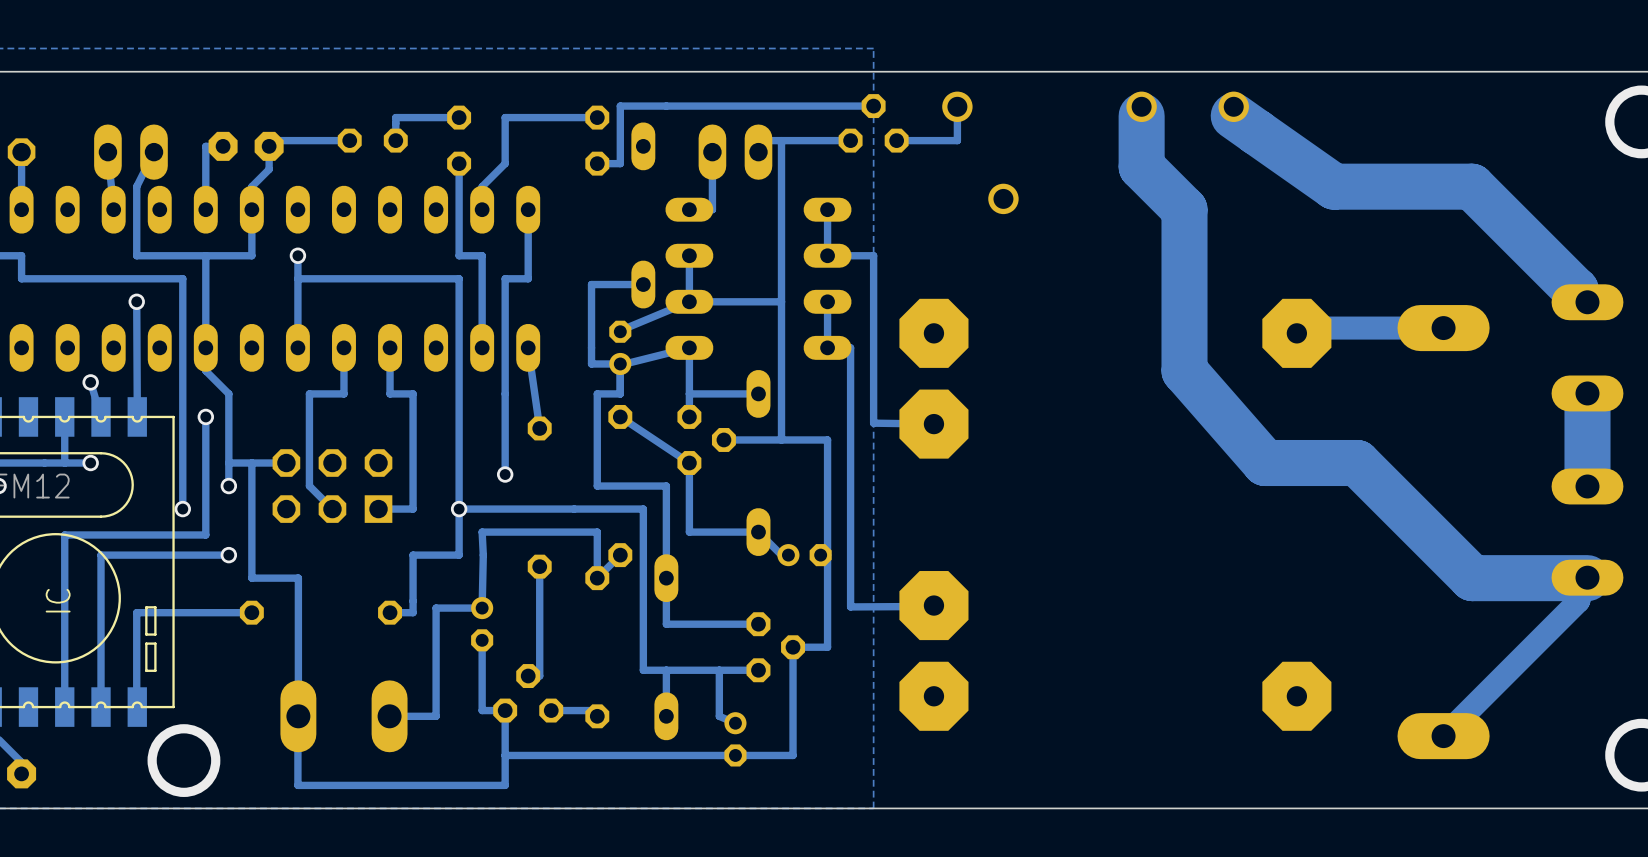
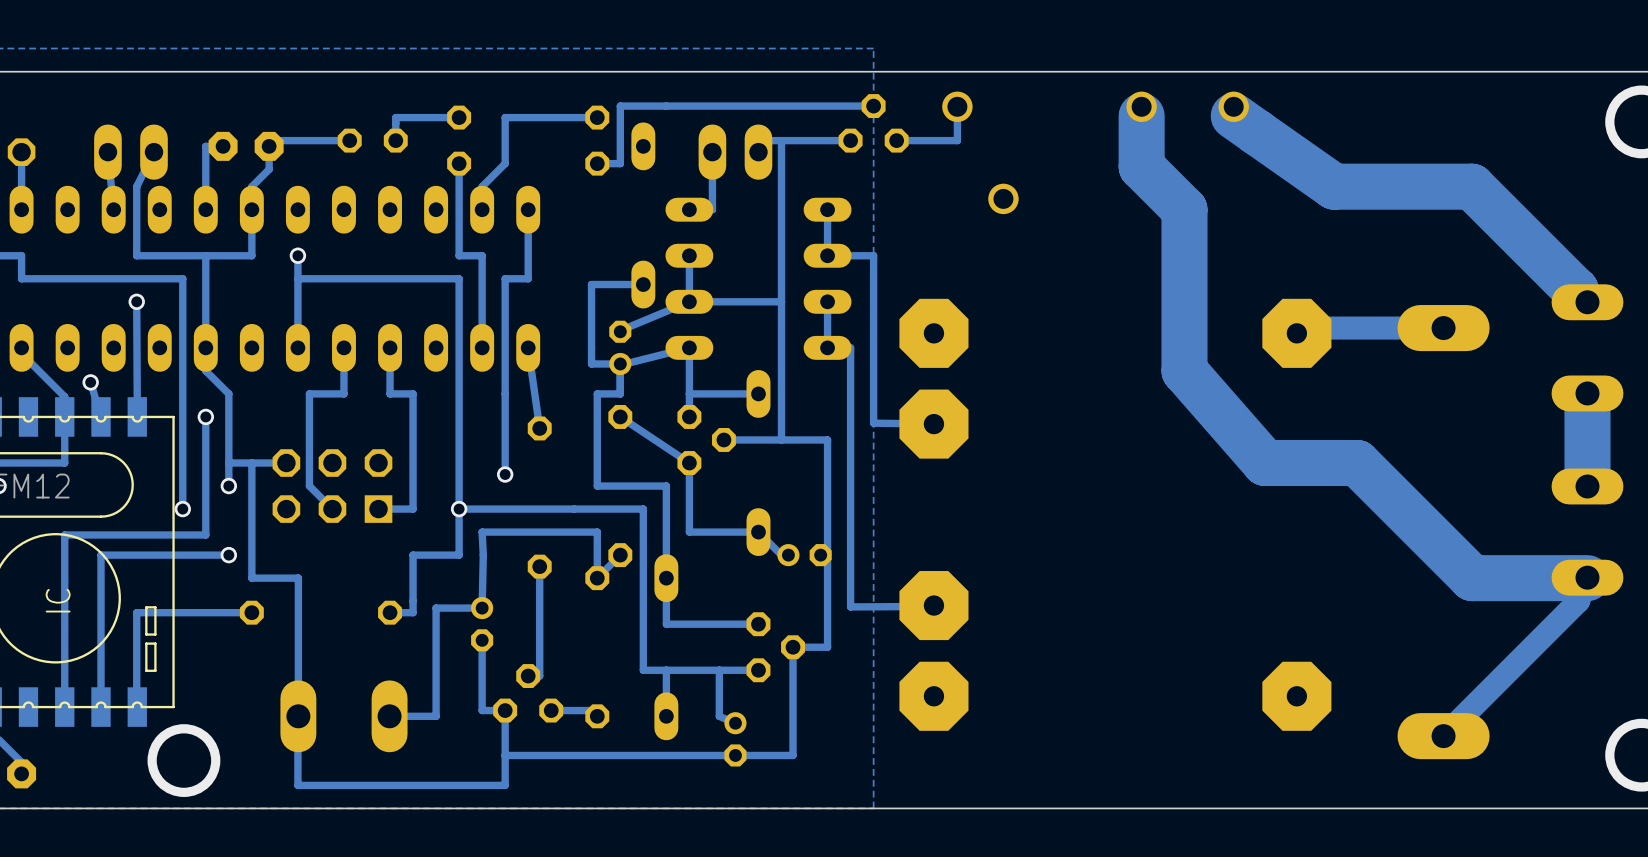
track: none -> (21, 347) (21, 359) (27, 359) (64, 396) (64, 416)
track: (90, 463) (64, 463) -> none
via: (90, 463) -> none

